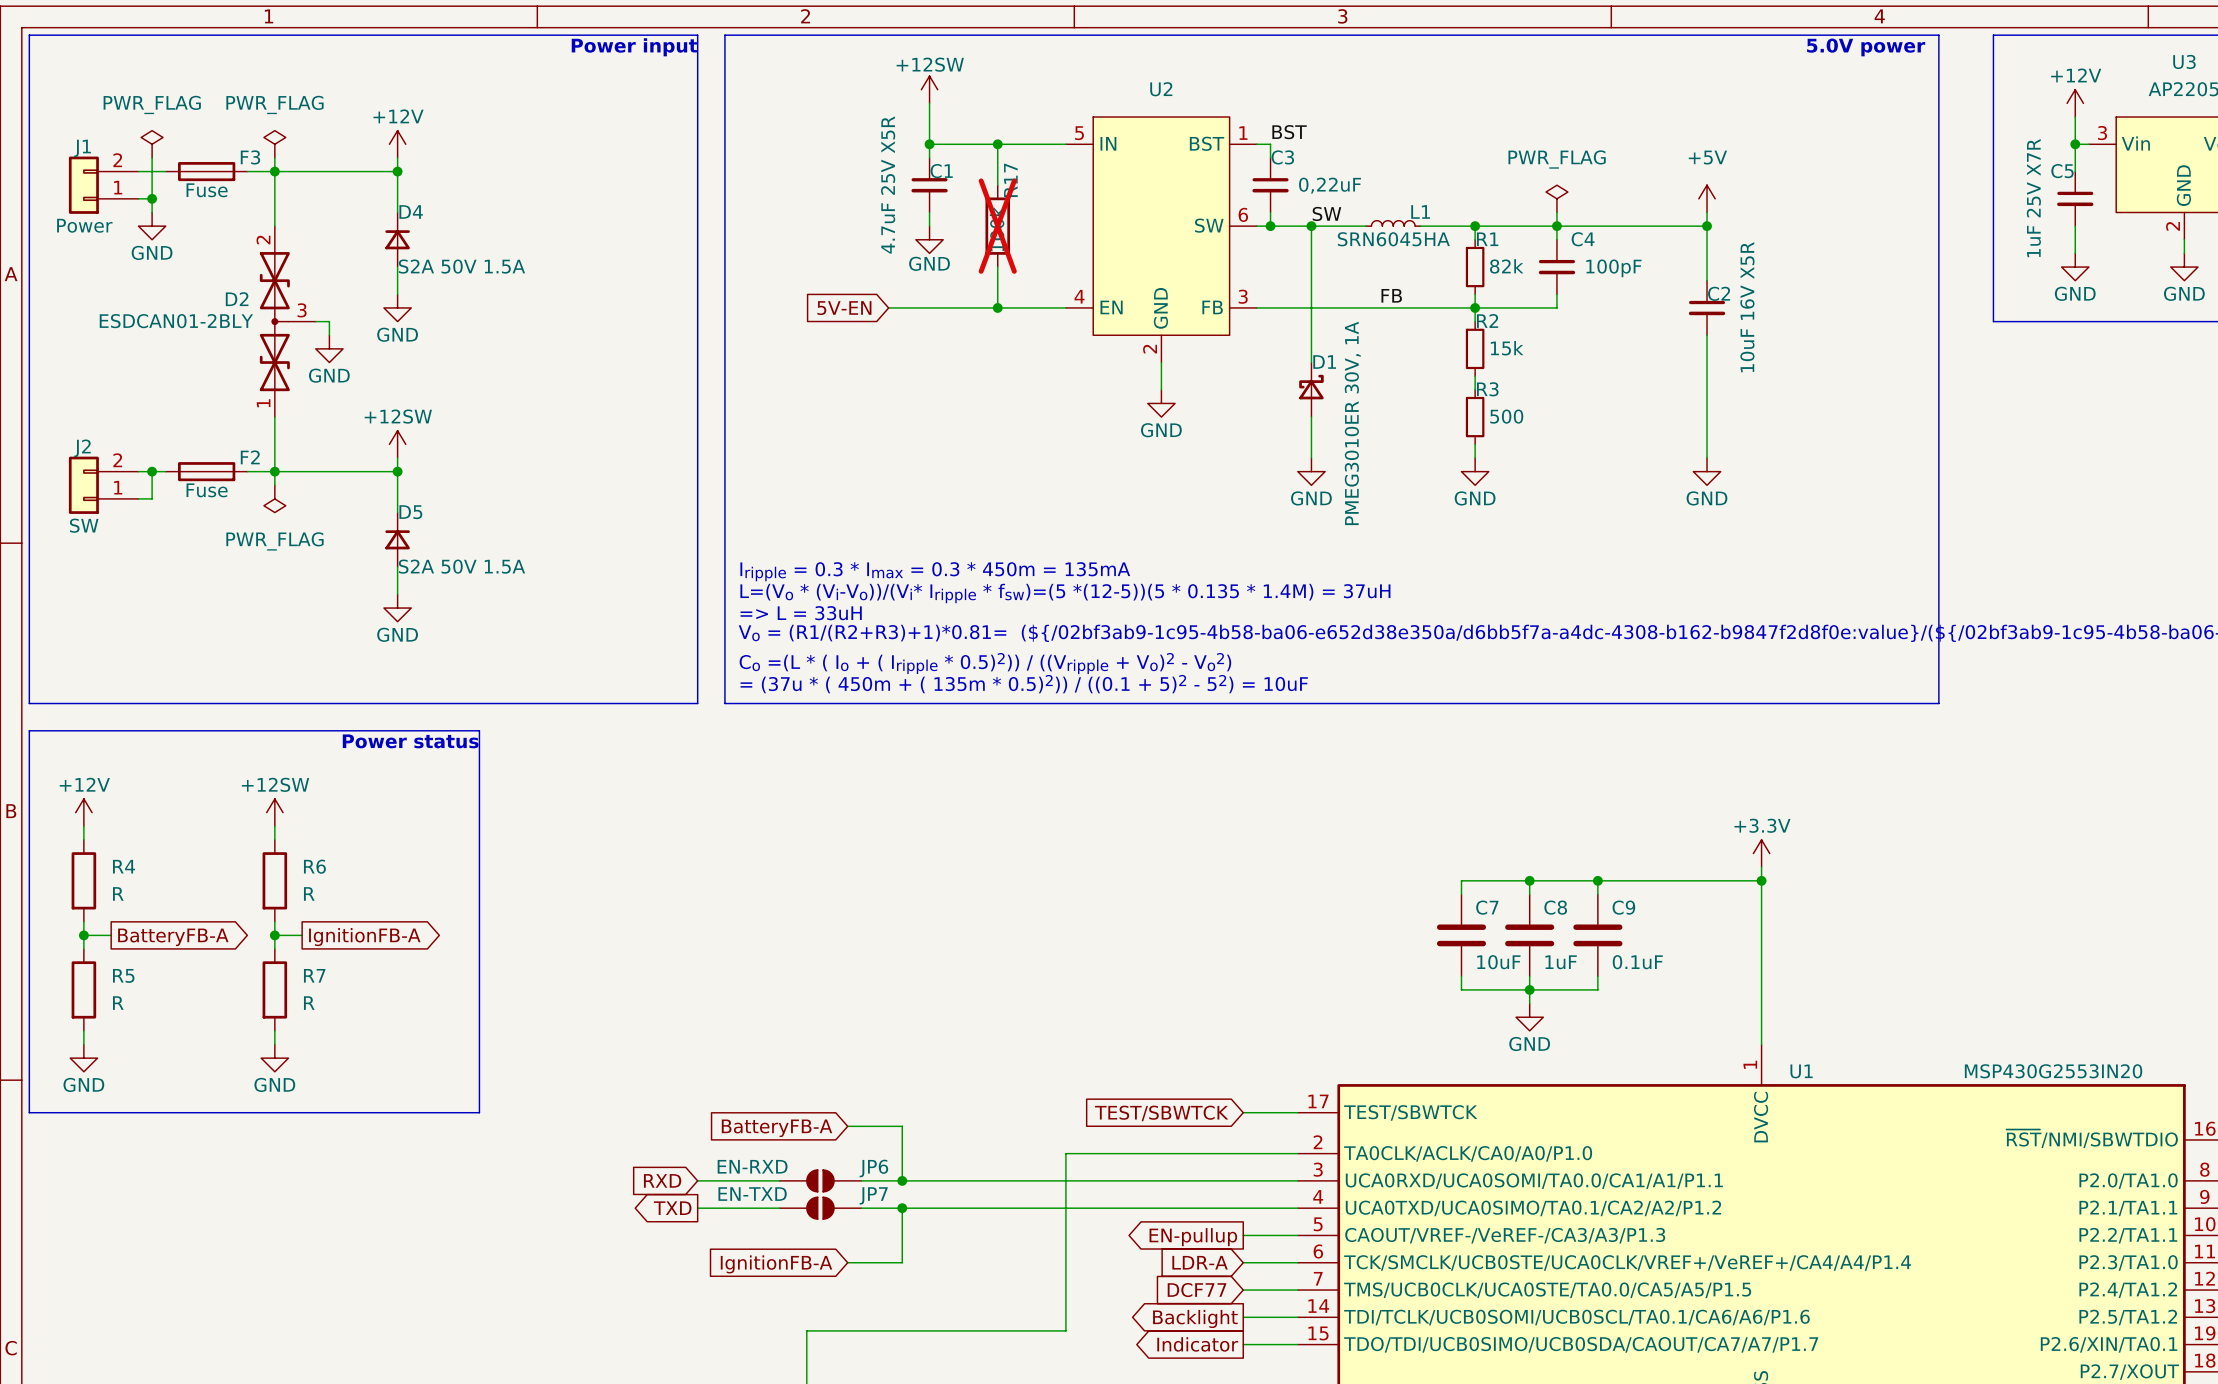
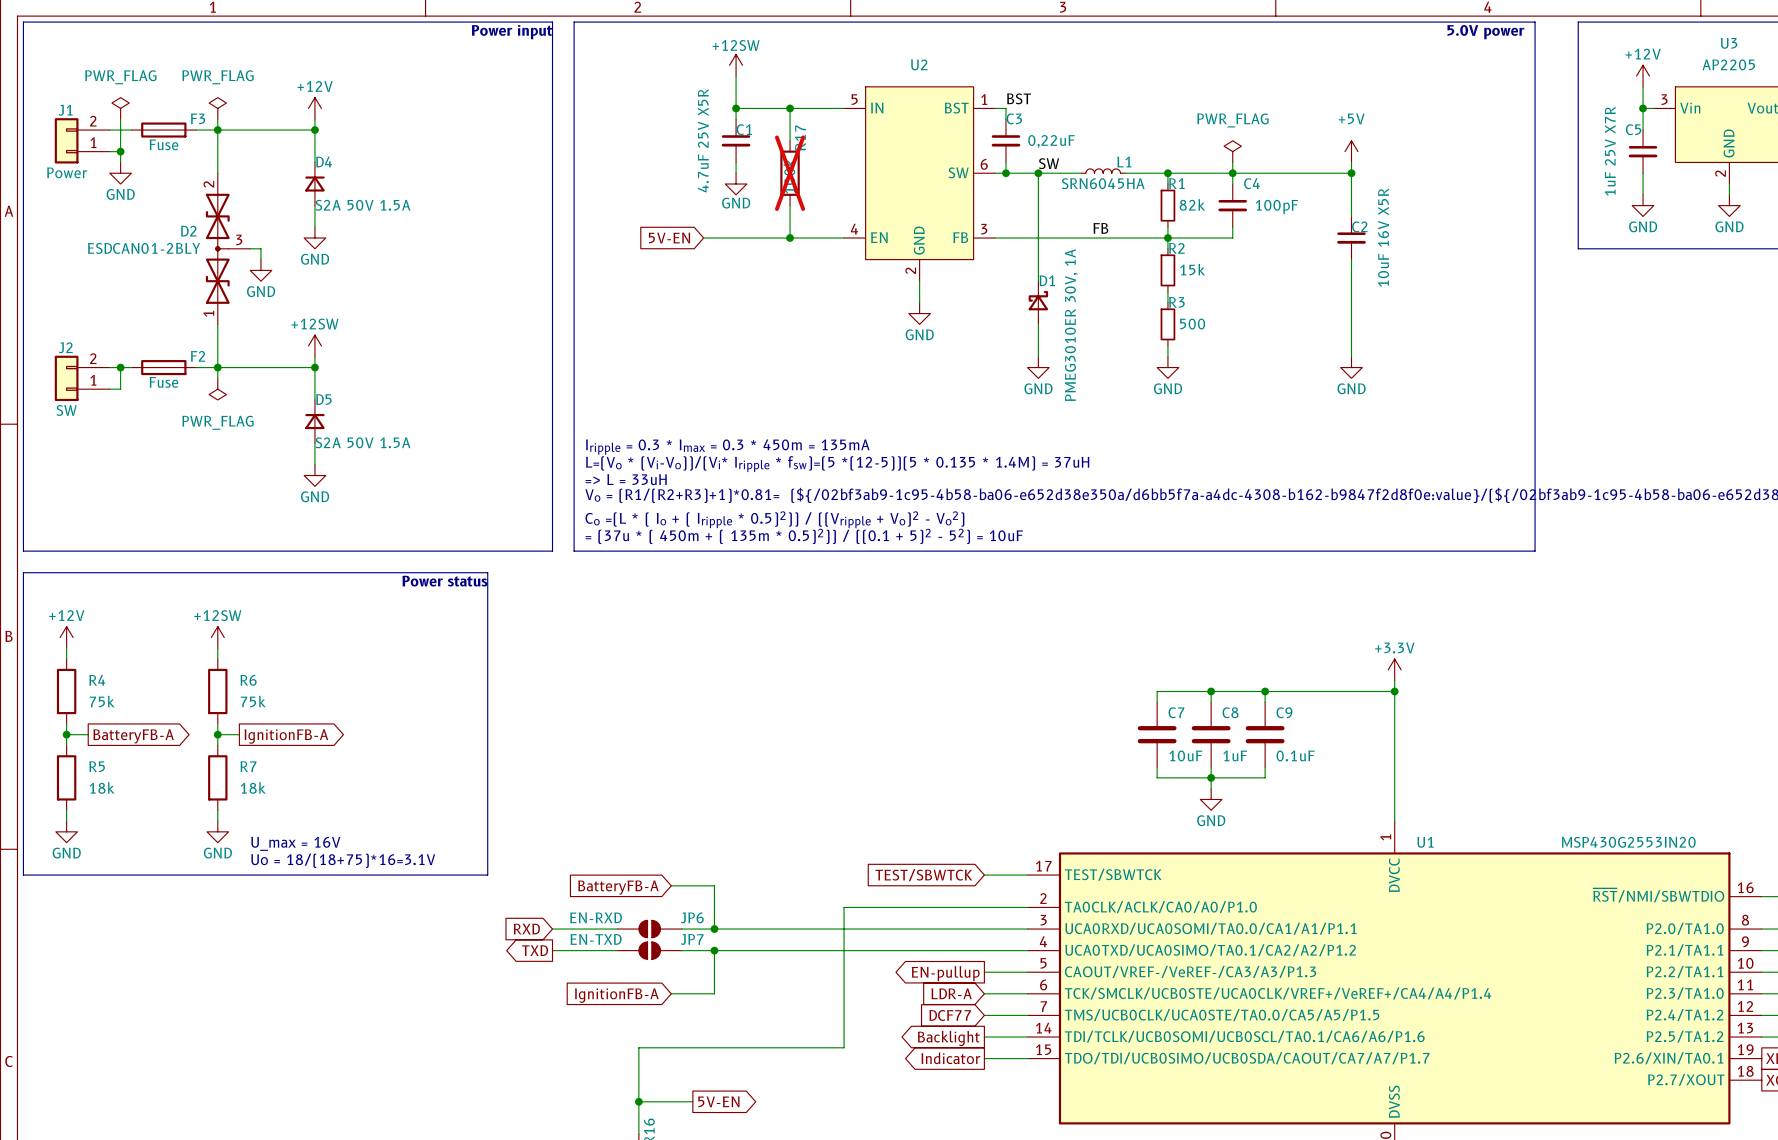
line: (479, 730) (479, 1112) -> (379, 572) (487, 572) (487, 875) (379, 875)
text position: Power status (410, 741) -> Power status (444, 581)
R4 value: R (118, 893) -> 75k (102, 701)
R6 value: R (309, 893) -> 75k (253, 701)
R5 value: R (118, 1003) -> 18k (102, 787)
R7 value: R (309, 1003) -> 18k (253, 787)
text: none -> U_max = 16V (295, 843)
text: none -> Uo = 18/(18+75)*16=3.1V (343, 860)

